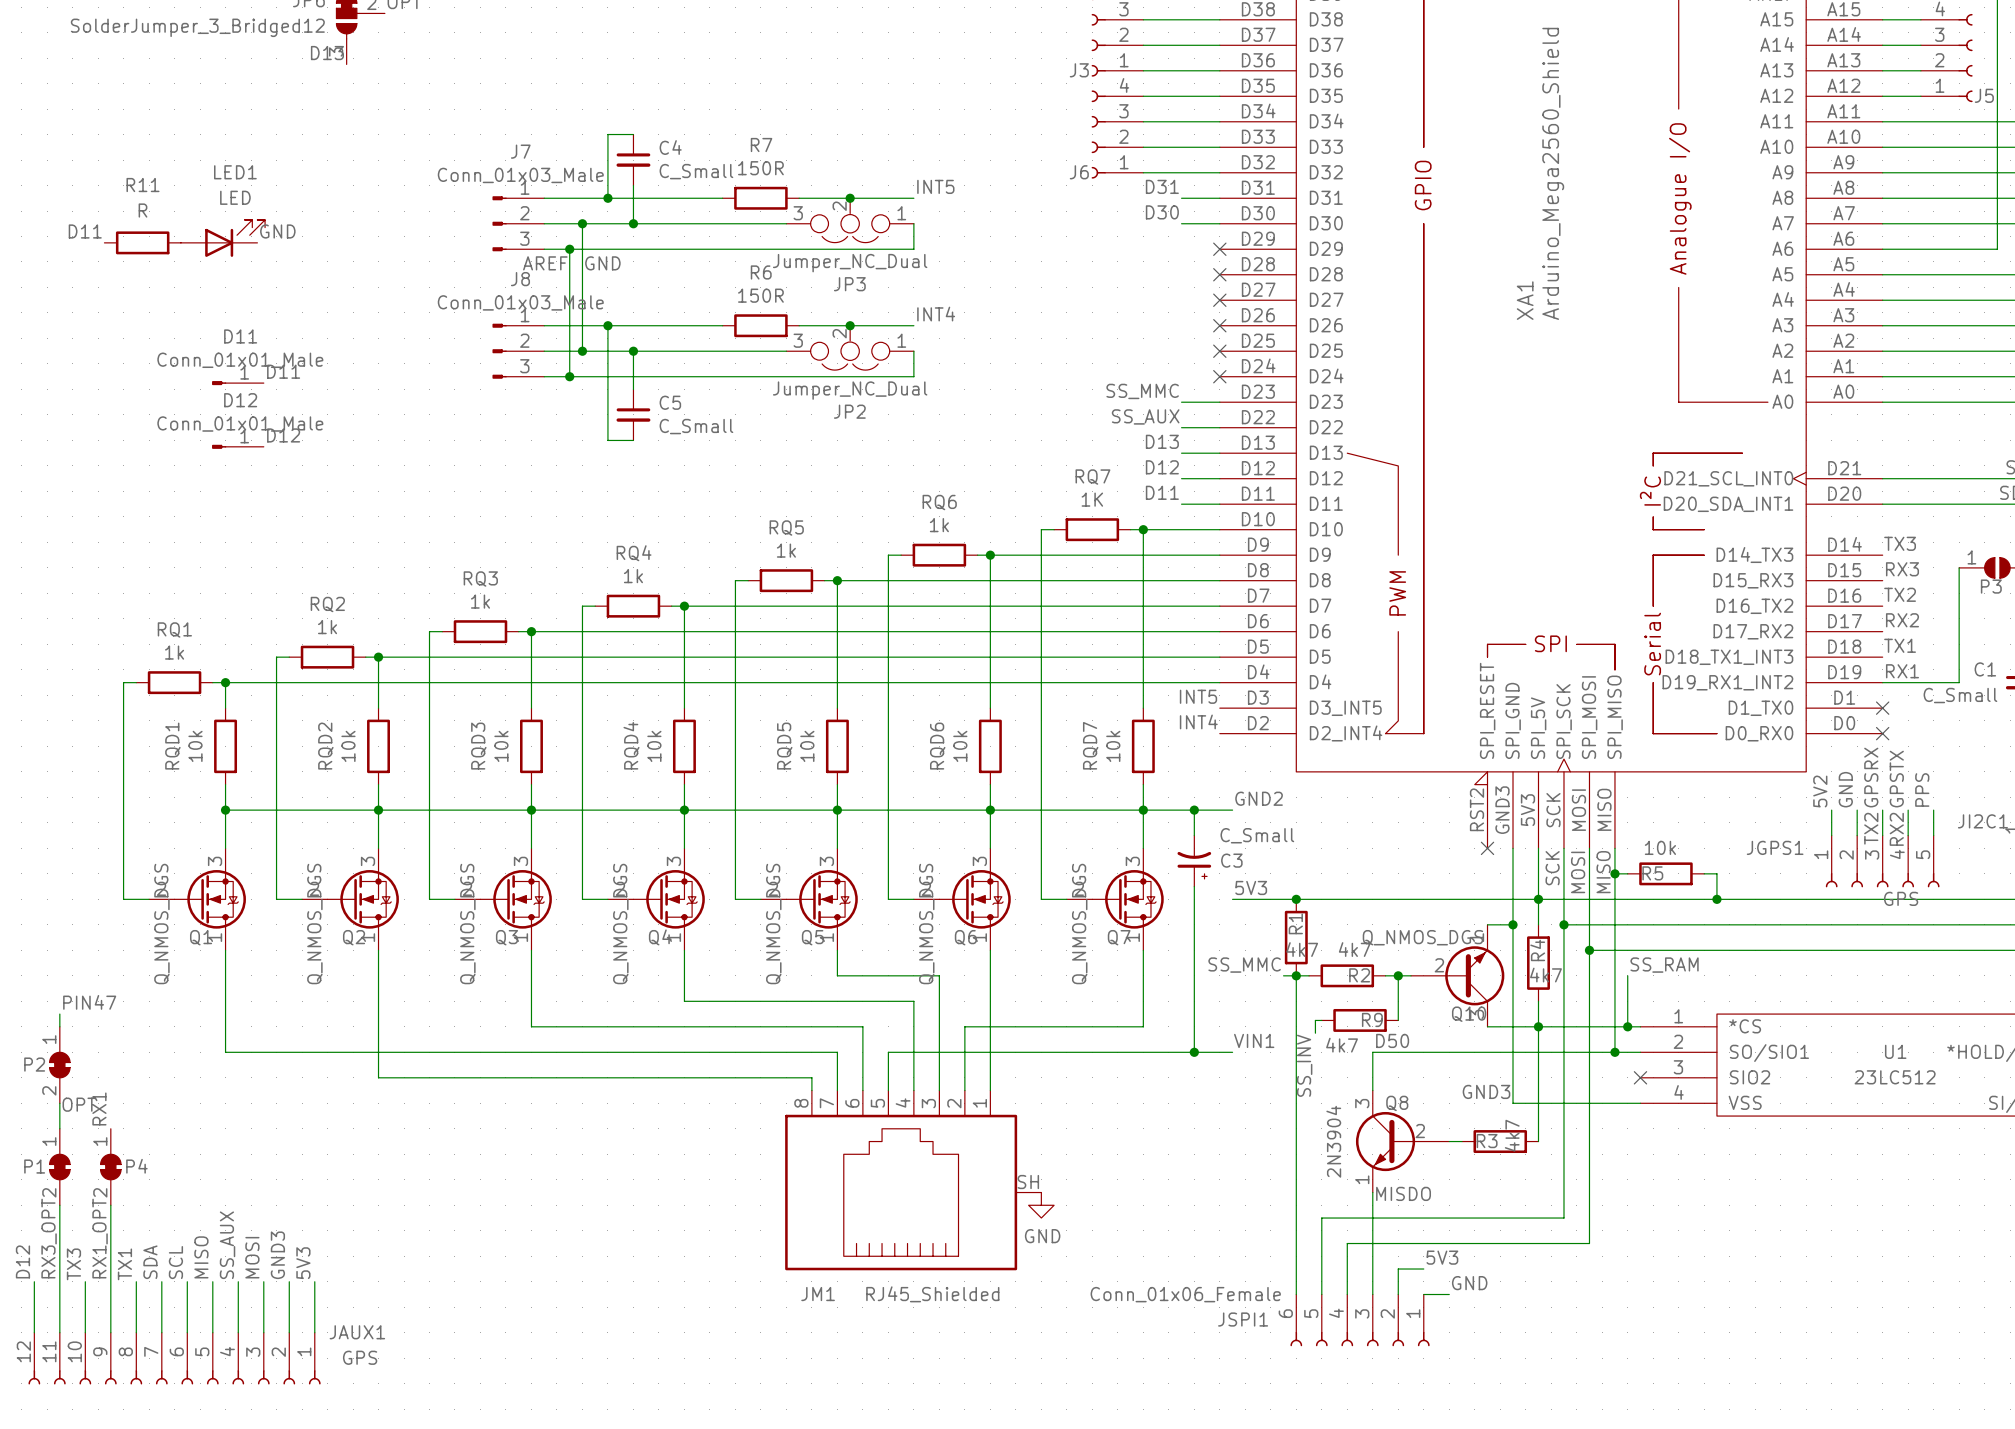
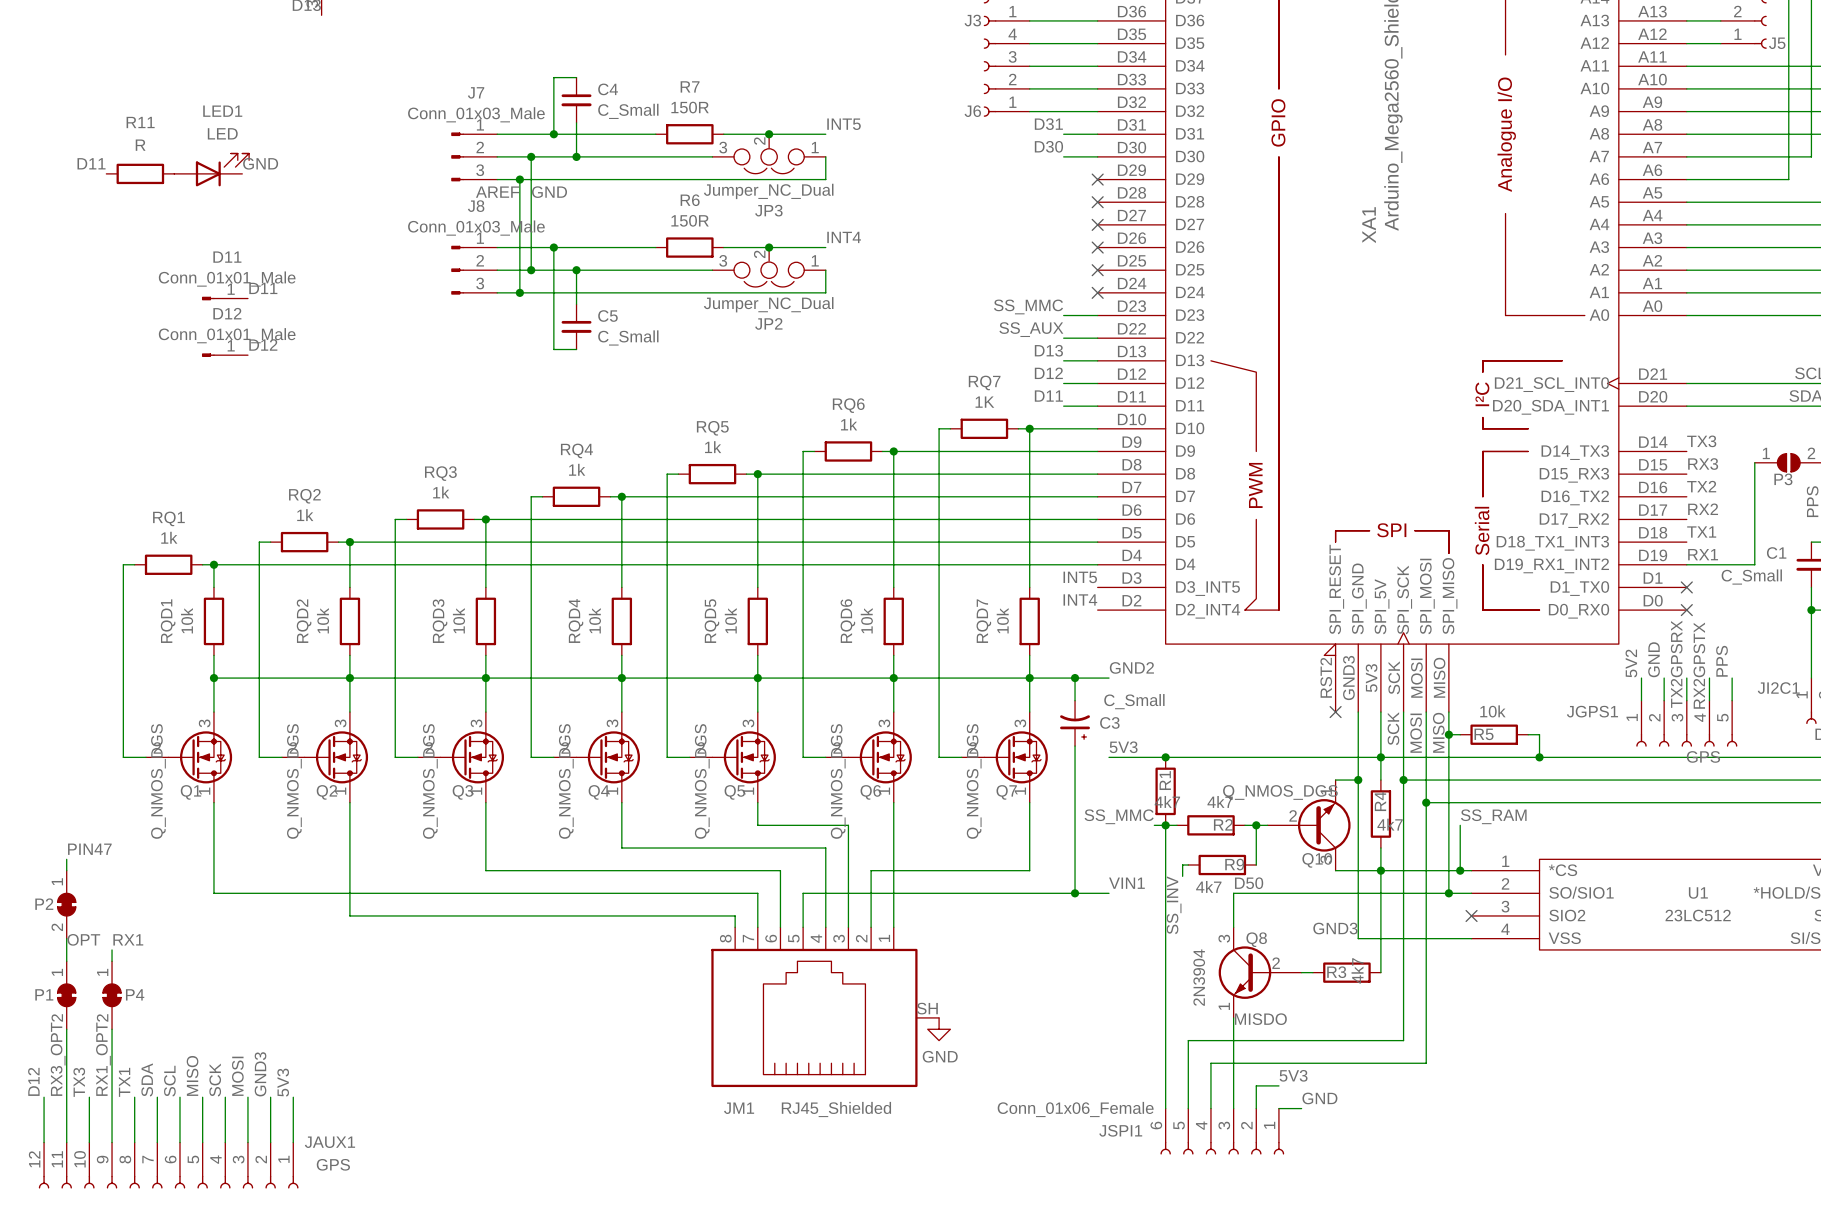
label rotation: 0° (99, 1108) -> 90° clockwise (128, 939)
wire: none -> (112, 949) (112, 961)
label: SS_AUX (227, 1245) -> SCK (215, 1080)

